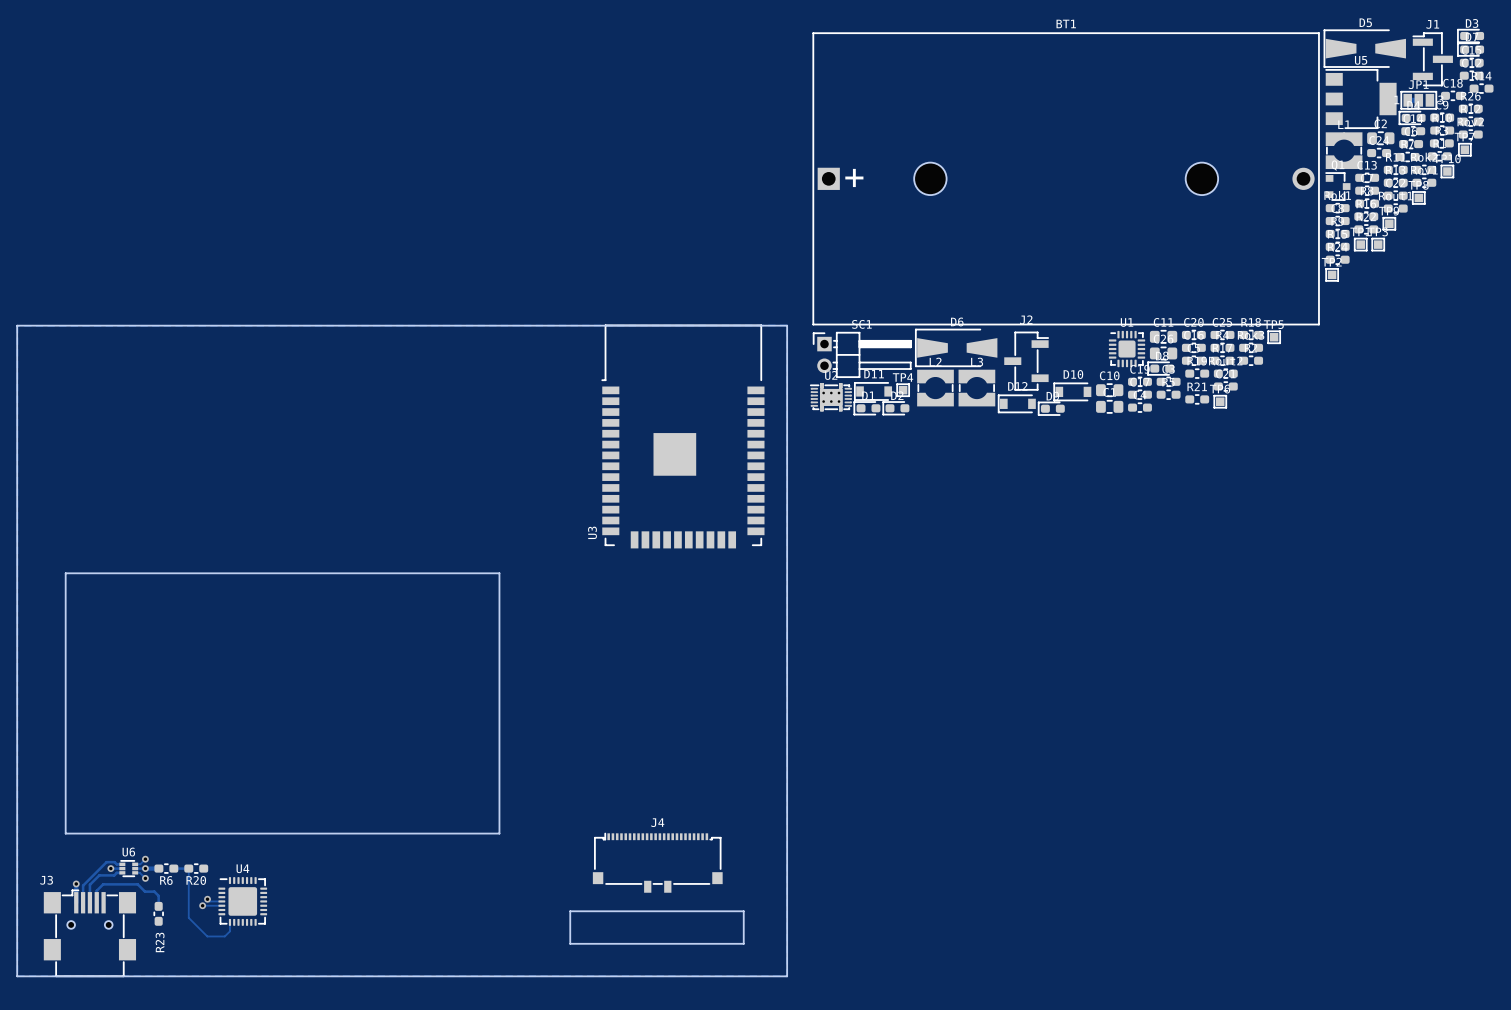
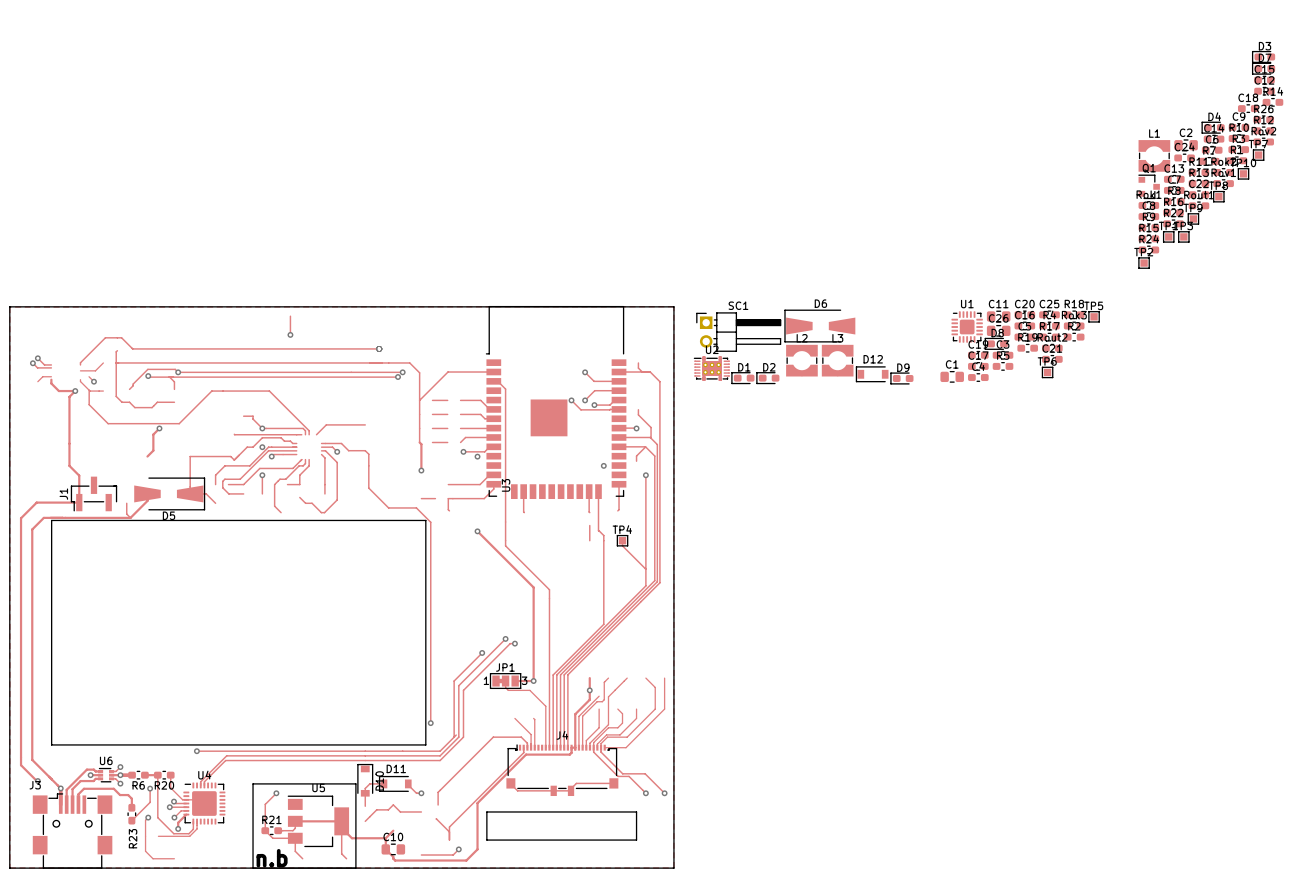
D5 rotation: 0° (1364, 48) -> 180° (169, 493)
D5 position: (1364, 48) -> (169, 493)
J1 rotation: 0° (1432, 59) -> 90° counterclockwise (93, 493)
J1 position: (1432, 59) -> (93, 493)
U5 position: (1361, 99) -> (318, 821)
JP1 position: (1418, 100) -> (505, 681)
BT1: (1066, 178) -> none
track: none -> (290, 316) (290, 334)
via: none -> (290, 334)
J2: (1026, 361) -> none
track: none -> (379, 348) (132, 348) (121, 337) (105, 337) (80, 364)
via: none -> (379, 348)
track: none -> (117, 350) (116, 396) (122, 402) (129, 402) (134, 407) (152, 407) (157, 402) (174, 402)
track: none -> (37, 358) (44, 364) (51, 364)
via: none -> (37, 358)
track: none -> (103, 362) (95, 370) (80, 370)
track: none -> (116, 362) (409, 362) (419, 372) (421, 470)
track: none -> (638, 362) (638, 368) (642, 372)
TP4 position: (903, 390) -> (622, 540)
C10 position: (1109, 390) -> (393, 849)
track: none -> (32, 363) (37, 367) (51, 367)
via: none -> (32, 363)
D11 position: (873, 391) -> (395, 783)
D10 rotation: 0° (1072, 391) -> 90° clockwise (365, 780)
D10 position: (1072, 391) -> (365, 780)
R21 position: (1197, 399) -> (271, 830)
via: none -> (178, 372)
track: none -> (402, 372) (178, 372) (175, 369) (147, 369) (129, 389)
via: none -> (402, 372)
track: none -> (493, 372) (448, 372) (419, 400)
track: none -> (585, 372) (594, 381) (619, 381)
via: none -> (585, 372)
track: none -> (619, 372) (650, 372) (659, 381) (659, 582) (567, 674) (567, 747)
track: none -> (148, 376) (400, 377)
via: none -> (148, 376)
track: none -> (51, 376) (42, 376) (37, 381)
track: none -> (89, 376) (93, 381)
track: none -> (169, 377) (174, 381) (174, 389)
via: none -> (398, 377)
track: none -> (51, 379) (51, 383) (58, 391) (75, 391) (69, 396) (69, 465) (79, 475) (79, 502)
track: none -> (80, 379) (89, 391) (103, 391)
via: none -> (93, 381)
track: none -> (493, 381) (497, 381) (505, 389) (505, 545) (549, 589) (549, 747)
track: none -> (89, 390) (89, 404) (108, 423) (179, 423) (211, 391) (269, 391) (309, 430) (309, 434)
track: none -> (619, 390) (594, 390) (585, 400)
via: none -> (75, 391)
track: none -> (619, 400) (614, 400) (609, 405) (594, 405)
track: none -> (432, 400) (447, 400)
track: none -> (460, 400) (480, 400) (489, 409) (493, 409)
track: none -> (571, 400) (580, 409) (619, 409)
via: none -> (571, 400)
via: none -> (585, 400)
U3 position: (683, 436) -> (556, 402)
via: none -> (594, 405)
track: none -> (638, 409) (638, 414) (651, 427) (651, 438)
track: none -> (432, 414) (447, 414)
track: none -> (460, 414) (480, 414) (484, 418) (493, 418)
track: none -> (243, 416) (253, 416) (253, 419) (262, 428) (303, 428) (305, 434)
track: none -> (365, 424) (326, 424) (316, 434)
track: none -> (159, 428) (153, 434) (153, 450) (147, 456)
via: none -> (159, 428)
via: none -> (262, 428)
track: none -> (432, 428) (447, 428)
track: none -> (493, 428) (460, 428)
track: none -> (619, 428) (636, 428)
via: none -> (636, 428)
track: none -> (234, 434) (301, 434)
track: none -> (493, 437) (465, 437) (460, 442)
track: none -> (619, 437) (650, 437) (657, 444) (657, 581) (564, 674) (564, 747)
track: none -> (432, 442) (447, 442)
track: none -> (296, 443) (284, 441) (281, 437) (262, 437) (253, 447) (247, 447) (234, 460) (230, 456) (190, 456) (190, 493) (206, 493) (215, 503)
track: none -> (321, 443) (341, 443) (348, 450) (365, 450) (368, 454) (368, 488) (388, 507) (416, 507) (430, 522) (430, 723)
track: none -> (493, 446) (489, 446) (484, 451) (463, 451)
track: none -> (619, 446) (645, 446) (654, 456) (654, 580) (560, 674) (560, 747)
via: none -> (262, 447)
track: none -> (296, 447) (268, 447) (249, 465) (224, 465) (215, 475) (215, 484)
track: none -> (321, 447) (332, 447) (337, 451)
track: none -> (645, 447) (636, 456) (636, 461)
track: none -> (296, 450) (268, 450) (240, 479) (224, 479) (222, 481) (222, 487) (228, 493) (243, 493)
track: none -> (321, 450) (325, 450) (337, 462) (337, 499) (324, 512) (321, 512) (312, 503) (305, 503) (299, 497)
via: none -> (337, 451)
via: none -> (463, 451)
track: none -> (296, 454) (273, 454) (271, 456)
track: none -> (321, 454) (324, 457) (324, 493)
via: none -> (271, 456)
via: none -> (477, 456)
track: none -> (301, 459) (292, 468) (259, 468) (243, 484) (228, 484)
track: none -> (305, 459) (303, 465) (299, 465) (285, 479) (279, 479) (274, 484) (274, 506) (281, 512)
track: none -> (309, 459) (309, 465) (299, 475) (299, 484) (287, 484)
via: none -> (603, 465)
via: none -> (421, 470)
track: none -> (262, 475) (262, 493)
via: none -> (262, 475)
track: none -> (493, 474) (489, 474) (480, 484) (448, 484)
track: none -> (645, 475) (645, 585) (556, 674) (556, 747)
via: none -> (645, 475)
track: none -> (493, 484) (493, 489) (484, 498) (448, 498) (449, 510)
track: none -> (619, 484) (617, 510)
track: none -> (523, 491) (524, 512)
track: none -> (589, 491) (589, 512)
track: none -> (598, 491) (598, 530) (603, 535) (603, 624) (553, 674) (553, 747)
track: none -> (147, 493) (147, 500) (130, 517)
track: none -> (421, 498) (435, 498)
track: none -> (79, 502) (36, 502) (21, 518) (21, 765) (35, 780)
track: none -> (126, 503) (126, 514) (130, 517)
track: none -> (130, 517) (43, 517) (32, 529) (32, 759) (60, 788)
track: none -> (589, 525) (589, 540)
track: none -> (477, 531) (533, 587) (533, 681) (515, 681)
via: none -> (477, 531)
track: none -> (622, 540) (622, 545) (645, 568)
track: none -> (505, 638) (458, 685) (458, 737) (440, 755) (226, 755) (200, 781) (200, 785)
via: none -> (505, 638)
track: none -> (514, 643) (510, 643) (463, 690) (463, 737) (440, 760) (225, 760) (204, 781) (204, 785)
via: none -> (514, 643)
track: none -> (482, 652) (454, 681) (454, 737)
via: none -> (482, 652)
track: none -> (589, 678) (589, 699) (575, 714) (575, 749)
track: none -> (608, 678) (604, 682) (604, 699) (597, 701) (582, 716) (582, 747)
track: none -> (627, 678) (614, 690)
track: none -> (645, 678) (655, 687) (655, 709) (627, 737) (607, 737) (601, 743) (601, 752) (622, 773) (645, 773) (664, 793)
track: none -> (664, 678) (664, 709) (626, 747) (604, 747)
track: none -> (505, 681) (505, 687) (508, 690) (529, 690) (545, 706) (545, 747)
via: none -> (533, 681)
via: none -> (589, 690)
track: none -> (614, 690) (608, 696) (608, 724) (589, 743) (589, 747)
track: none -> (599, 696) (578, 716) (578, 747)
track: none -> (599, 709) (599, 727) (586, 740) (586, 747)
track: none -> (617, 709) (622, 713) (622, 723) (617, 727) (608, 727) (593, 742) (593, 752) (617, 776) (629, 776) (645, 793)
track: none -> (636, 709) (636, 718) (620, 734) (606, 734) (597, 744) (597, 747)
track: none -> (514, 718) (531, 734) (531, 747)
track: none -> (533, 718) (534, 747)
via: none -> (430, 723)
track: none -> (456, 735) (440, 751) (196, 751)
track: none -> (523, 747) (523, 752) (449, 827) (449, 840)
track: none -> (527, 747) (527, 743) (521, 737) (493, 737) (438, 792) (438, 804)
track: none -> (575, 747) (571, 747) (569, 754) (526, 754) (477, 803) (477, 849) (466, 860) (395, 860) (385, 849) (385, 838)
via: none -> (196, 751)
track: none -> (170, 775) (170, 787) (182, 799) (200, 799) (204, 803)
via: none -> (37, 781)
line: none -> (253, 783) (253, 868) (355, 868) (355, 783) (253, 783)
track: none -> (383, 783) (369, 783) (365, 788) (365, 806)
track: none -> (408, 783) (416, 793) (421, 793)
track: none -> (510, 783) (517, 790) (571, 790) (576, 783) (613, 783)
track: none -> (150, 788) (150, 802) (131, 820)
via: none -> (150, 788)
track: none -> (276, 793) (265, 804) (265, 830) (272, 838) (295, 838) (295, 851) (302, 858)
via: none -> (276, 793)
via: none -> (421, 793)
via: none -> (645, 793)
via: none -> (664, 793)
track: none -> (186, 810) (181, 810) (174, 817)
track: none -> (421, 811) (400, 811) (393, 804) (388, 809) (376, 809) (365, 821)
track: none -> (186, 814) (178, 822) (178, 828)
track: none -> (148, 817) (145, 820) (145, 851) (153, 858) (174, 858)
via: none -> (148, 817)
via: none -> (174, 817)
track: none -> (436, 818) (449, 831)
track: none -> (197, 821) (197, 829) (189, 836) (158, 836)
track: none -> (341, 821) (295, 821) (295, 828) (292, 830) (278, 830)
track: none -> (341, 821) (341, 827) (351, 838) (385, 838)
track: none -> (341, 821) (341, 853) (346, 858)
via: none -> (178, 828)
track: none -> (393, 830) (385, 838)
track: none -> (458, 849) (453, 855) (421, 855)
via: none -> (458, 849)
text: none -> n.b (272, 858)

